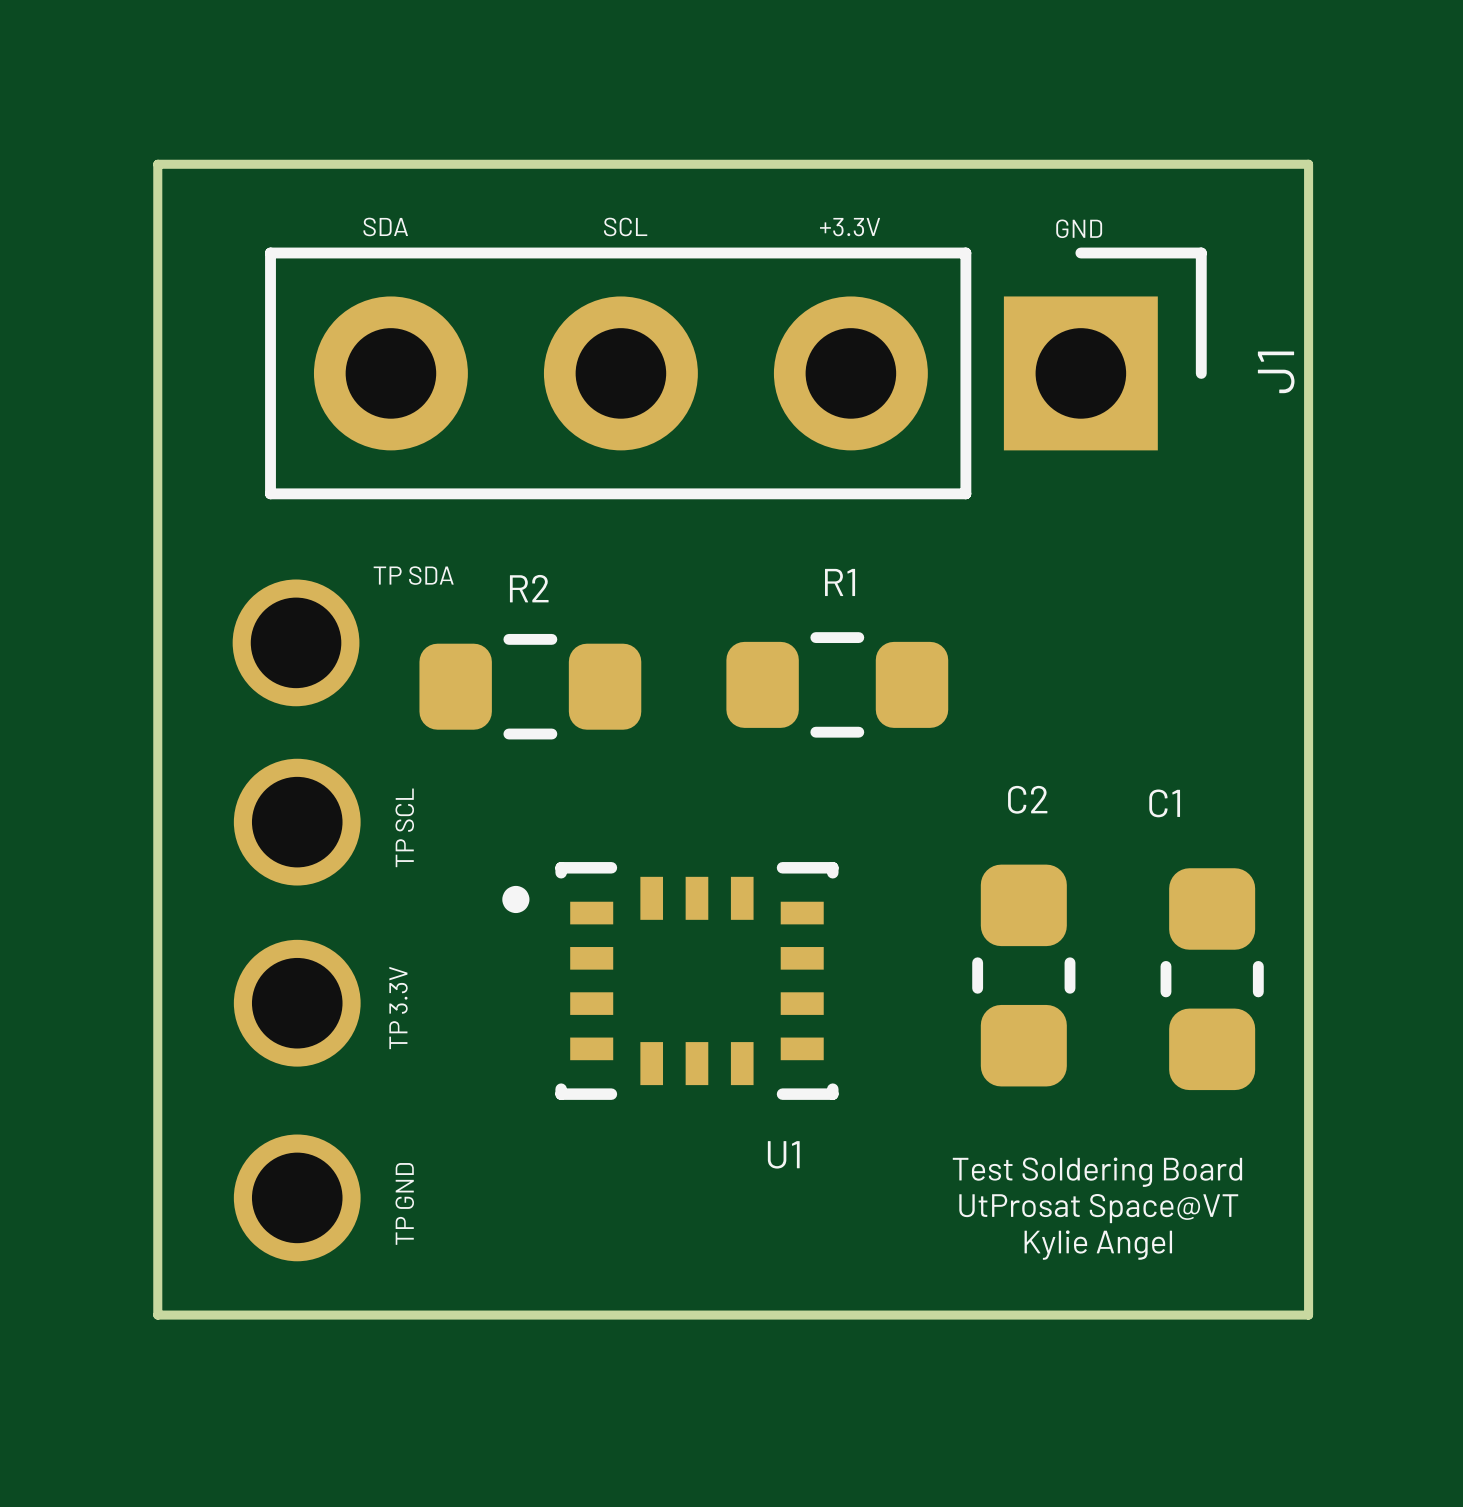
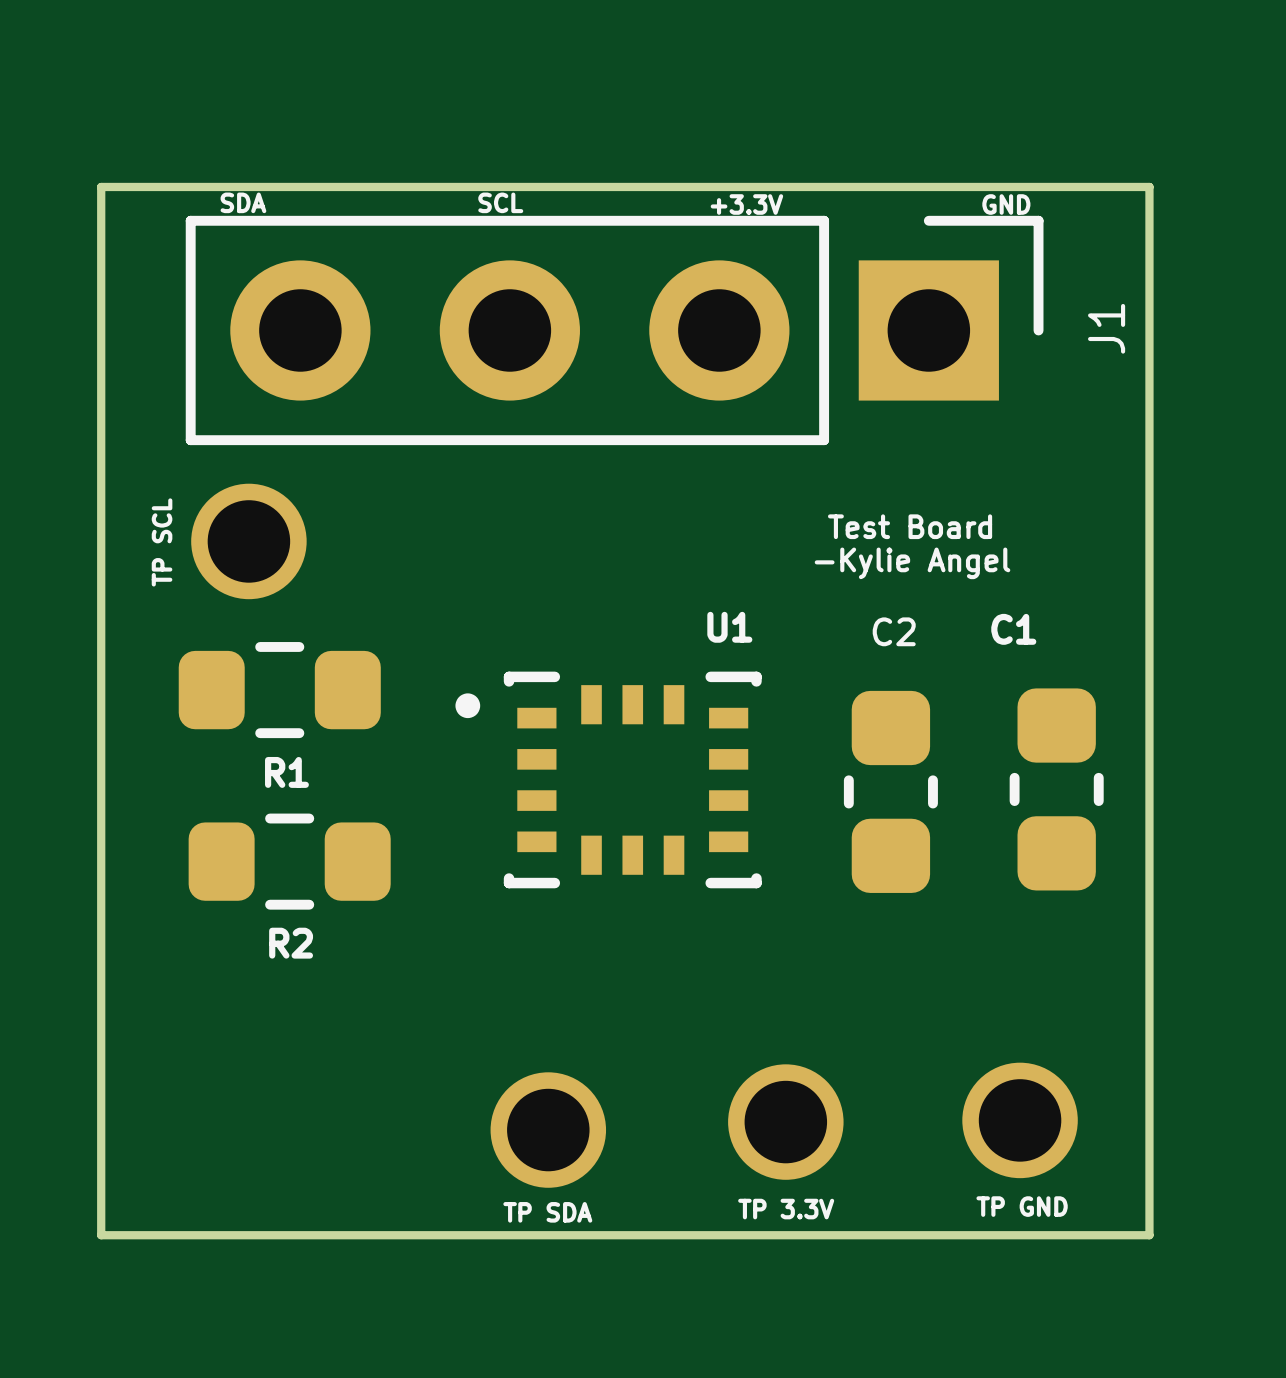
text position: SDA (385, 226) -> SDA (243, 202)
text position: SCL (625, 226) -> SCL (500, 202)
text position: +3.3V (850, 227) -> +3.3V (746, 204)
text position: GND (1079, 228) -> GND (1006, 204)
J1 position: (735, 373) -> (614, 330)
text: none -> Test Board (910, 526)
text position: TP SDA (413, 575) -> TP SDA (547, 1212)
text: none -> -Kylie Angel (912, 563)
R1 name position: R1 (840, 582) -> R1 (286, 772)
R2 name position: R2 (529, 588) -> R2 (291, 943)
part position: (296, 642) -> (248, 541)
R1 position: (837, 684) -> (279, 690)
R2 position: (530, 686) -> (289, 861)
part: (297, 822) -> none
text position: TP SCL (404, 827) -> TP SCL (162, 542)
C2 position: (1023, 975) -> (890, 791)
C1 position: (1212, 979) -> (1056, 789)
U1 position: (670, 980) -> (608, 779)
part: (297, 1003) -> none
text rotation: 0° (398, 1008) -> 90° clockwise (786, 1209)
text position: TP 3.3V (398, 1008) -> TP 3.3V (786, 1209)
U1 name position: U1 (783, 1154) -> U1 (729, 627)
text: Test Soldering Board (1097, 1172) -> none
part: none -> (1020, 1120)
part: none -> (785, 1122)
part: (297, 1197) -> none
part: none -> (548, 1130)
text rotation: 0° (404, 1203) -> 90° clockwise (1022, 1206)
text position: TP GND (404, 1203) -> TP GND (1022, 1206)
text: UtProsat Space@VT (1098, 1208) -> none
text: Kylie Angel (1098, 1245) -> none

